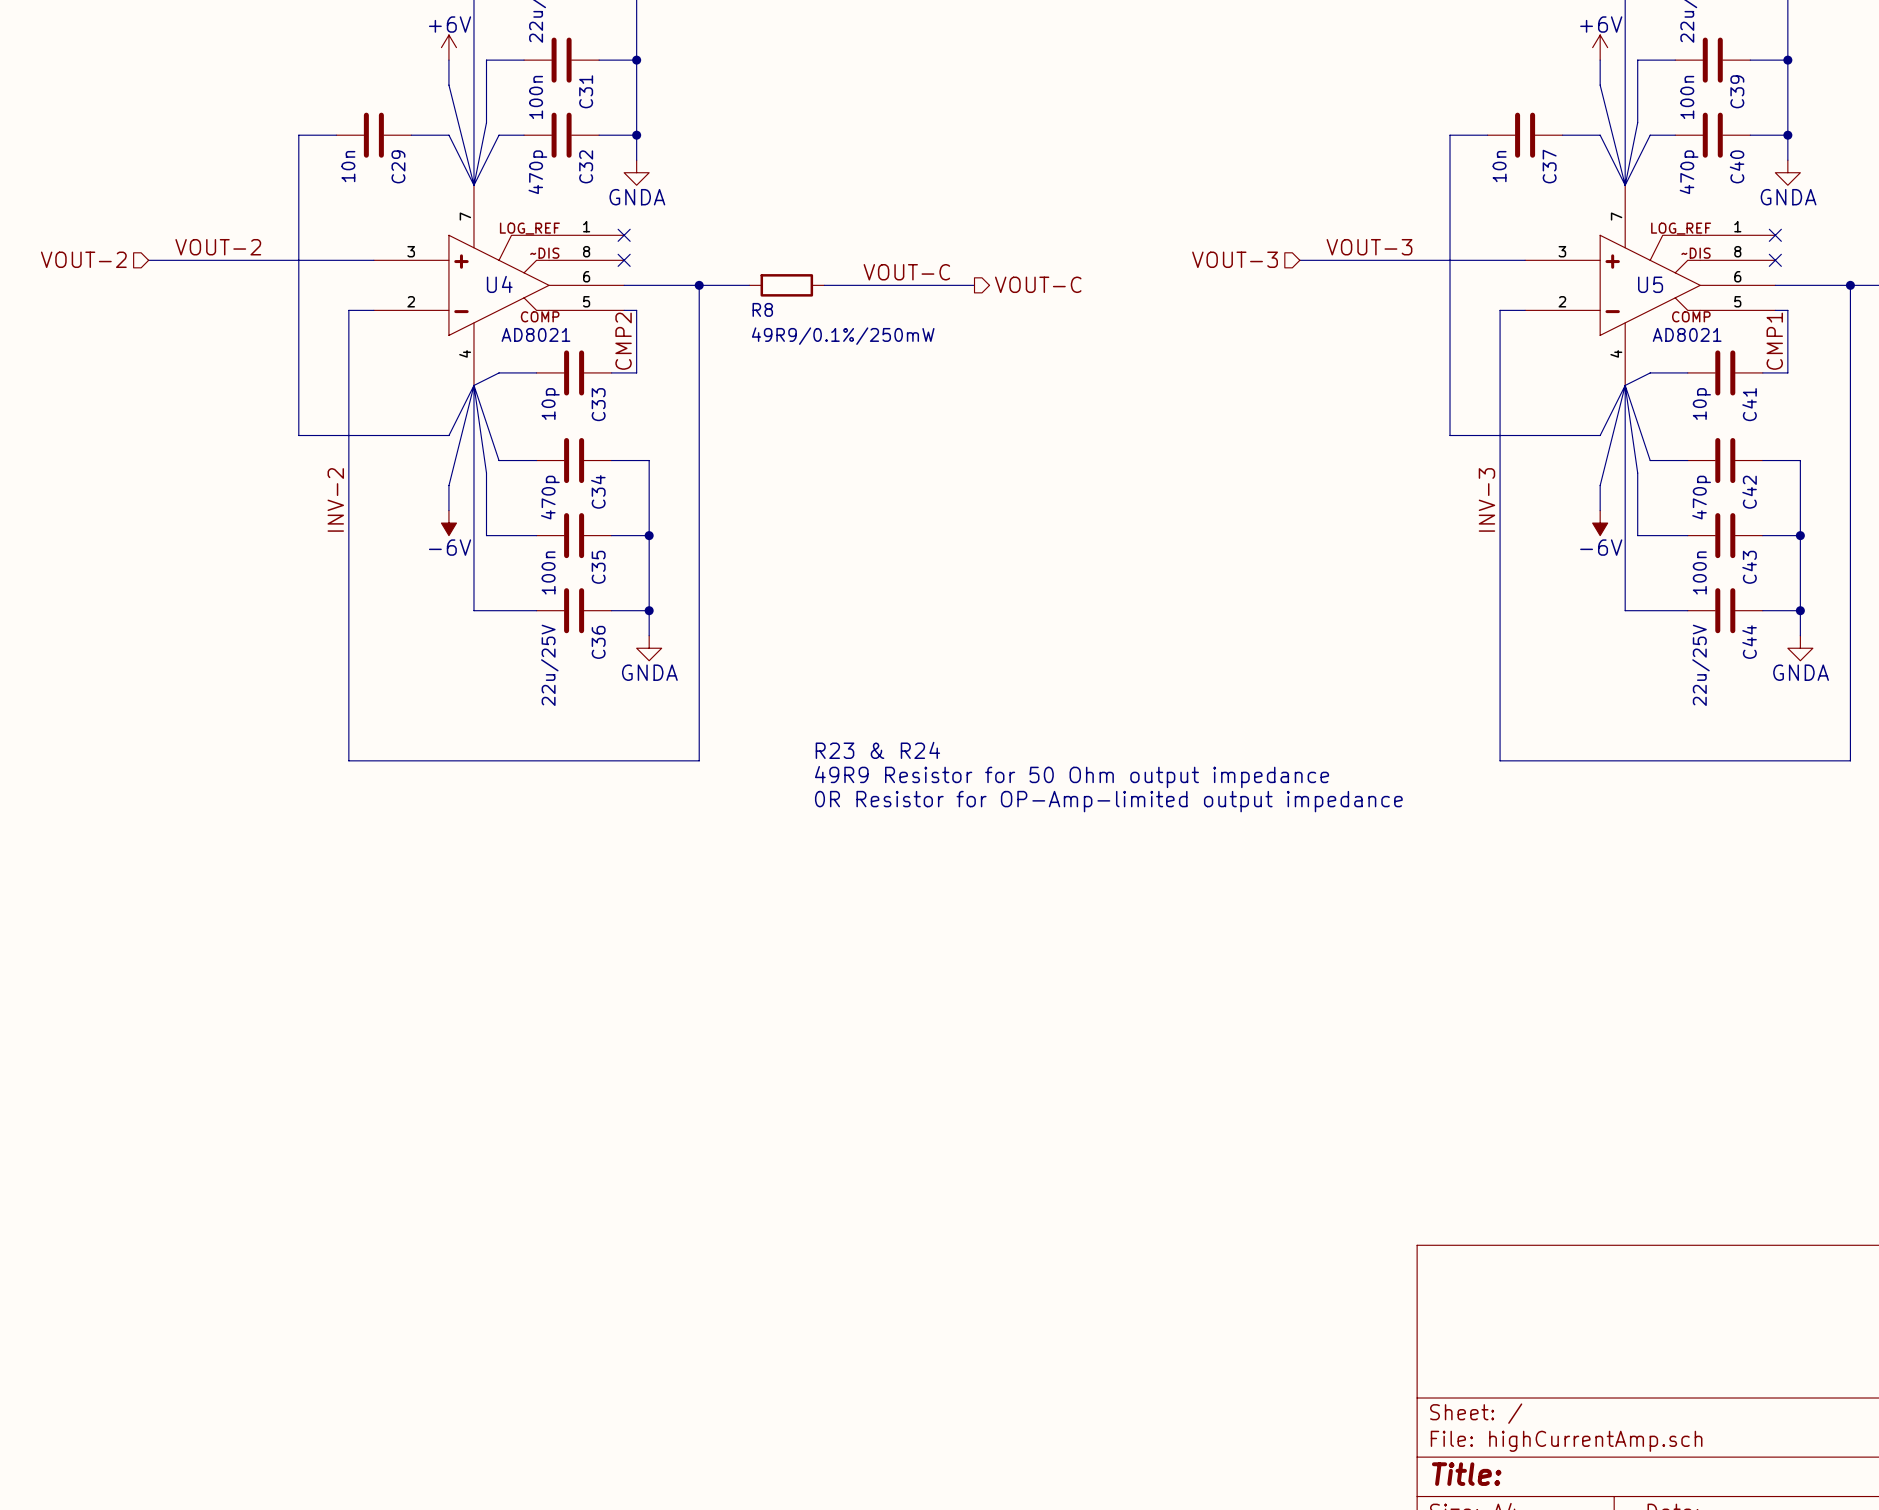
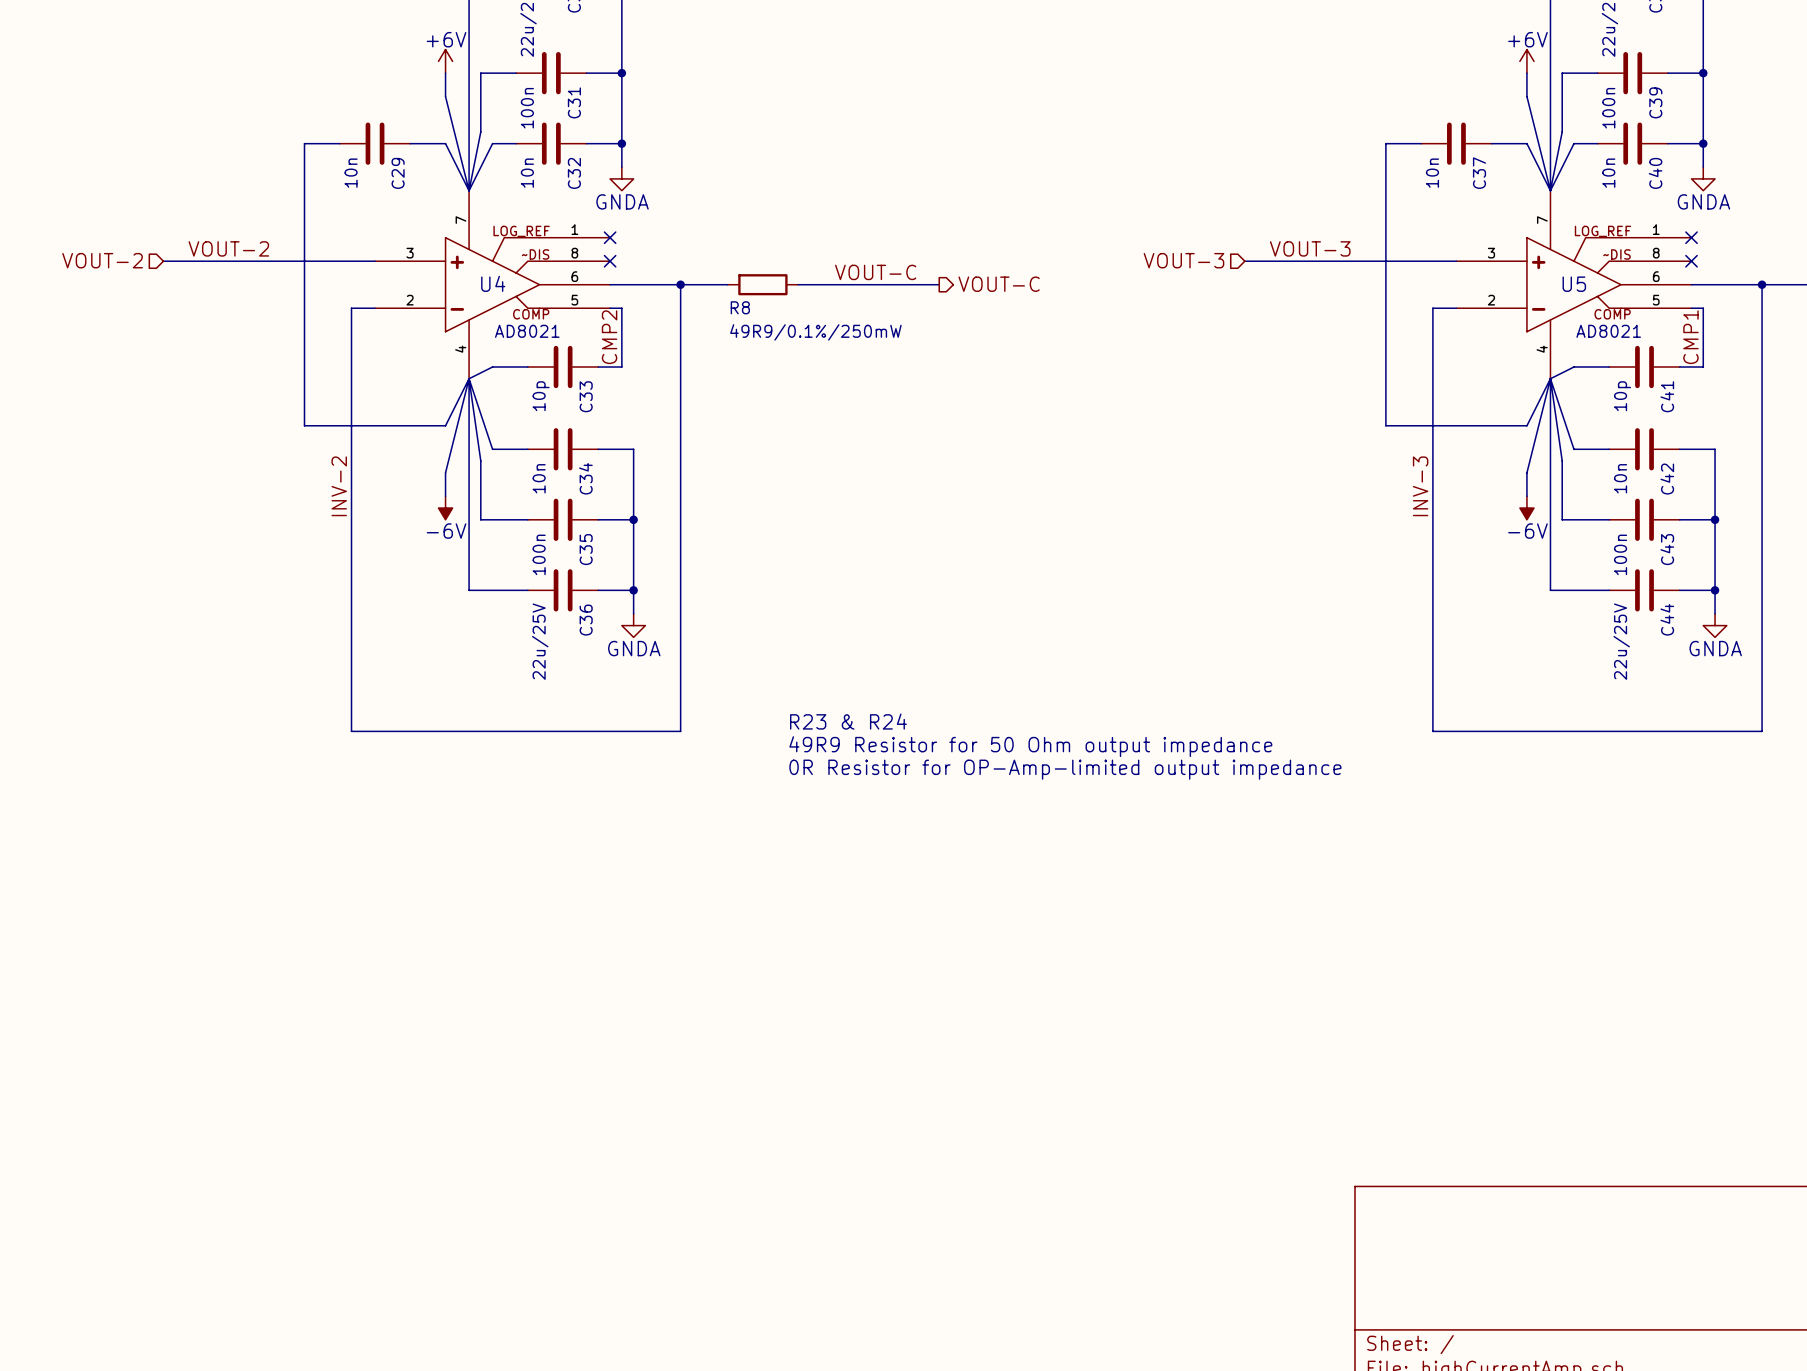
C32 value: 470p (537, 172) -> 10n (527, 173)
C40 value: 470p (1689, 172) -> 10n (1608, 173)
C34 value: 470p (550, 497) -> 10n (539, 478)
C42 value: 470p (1701, 497) -> 10n (1620, 478)

